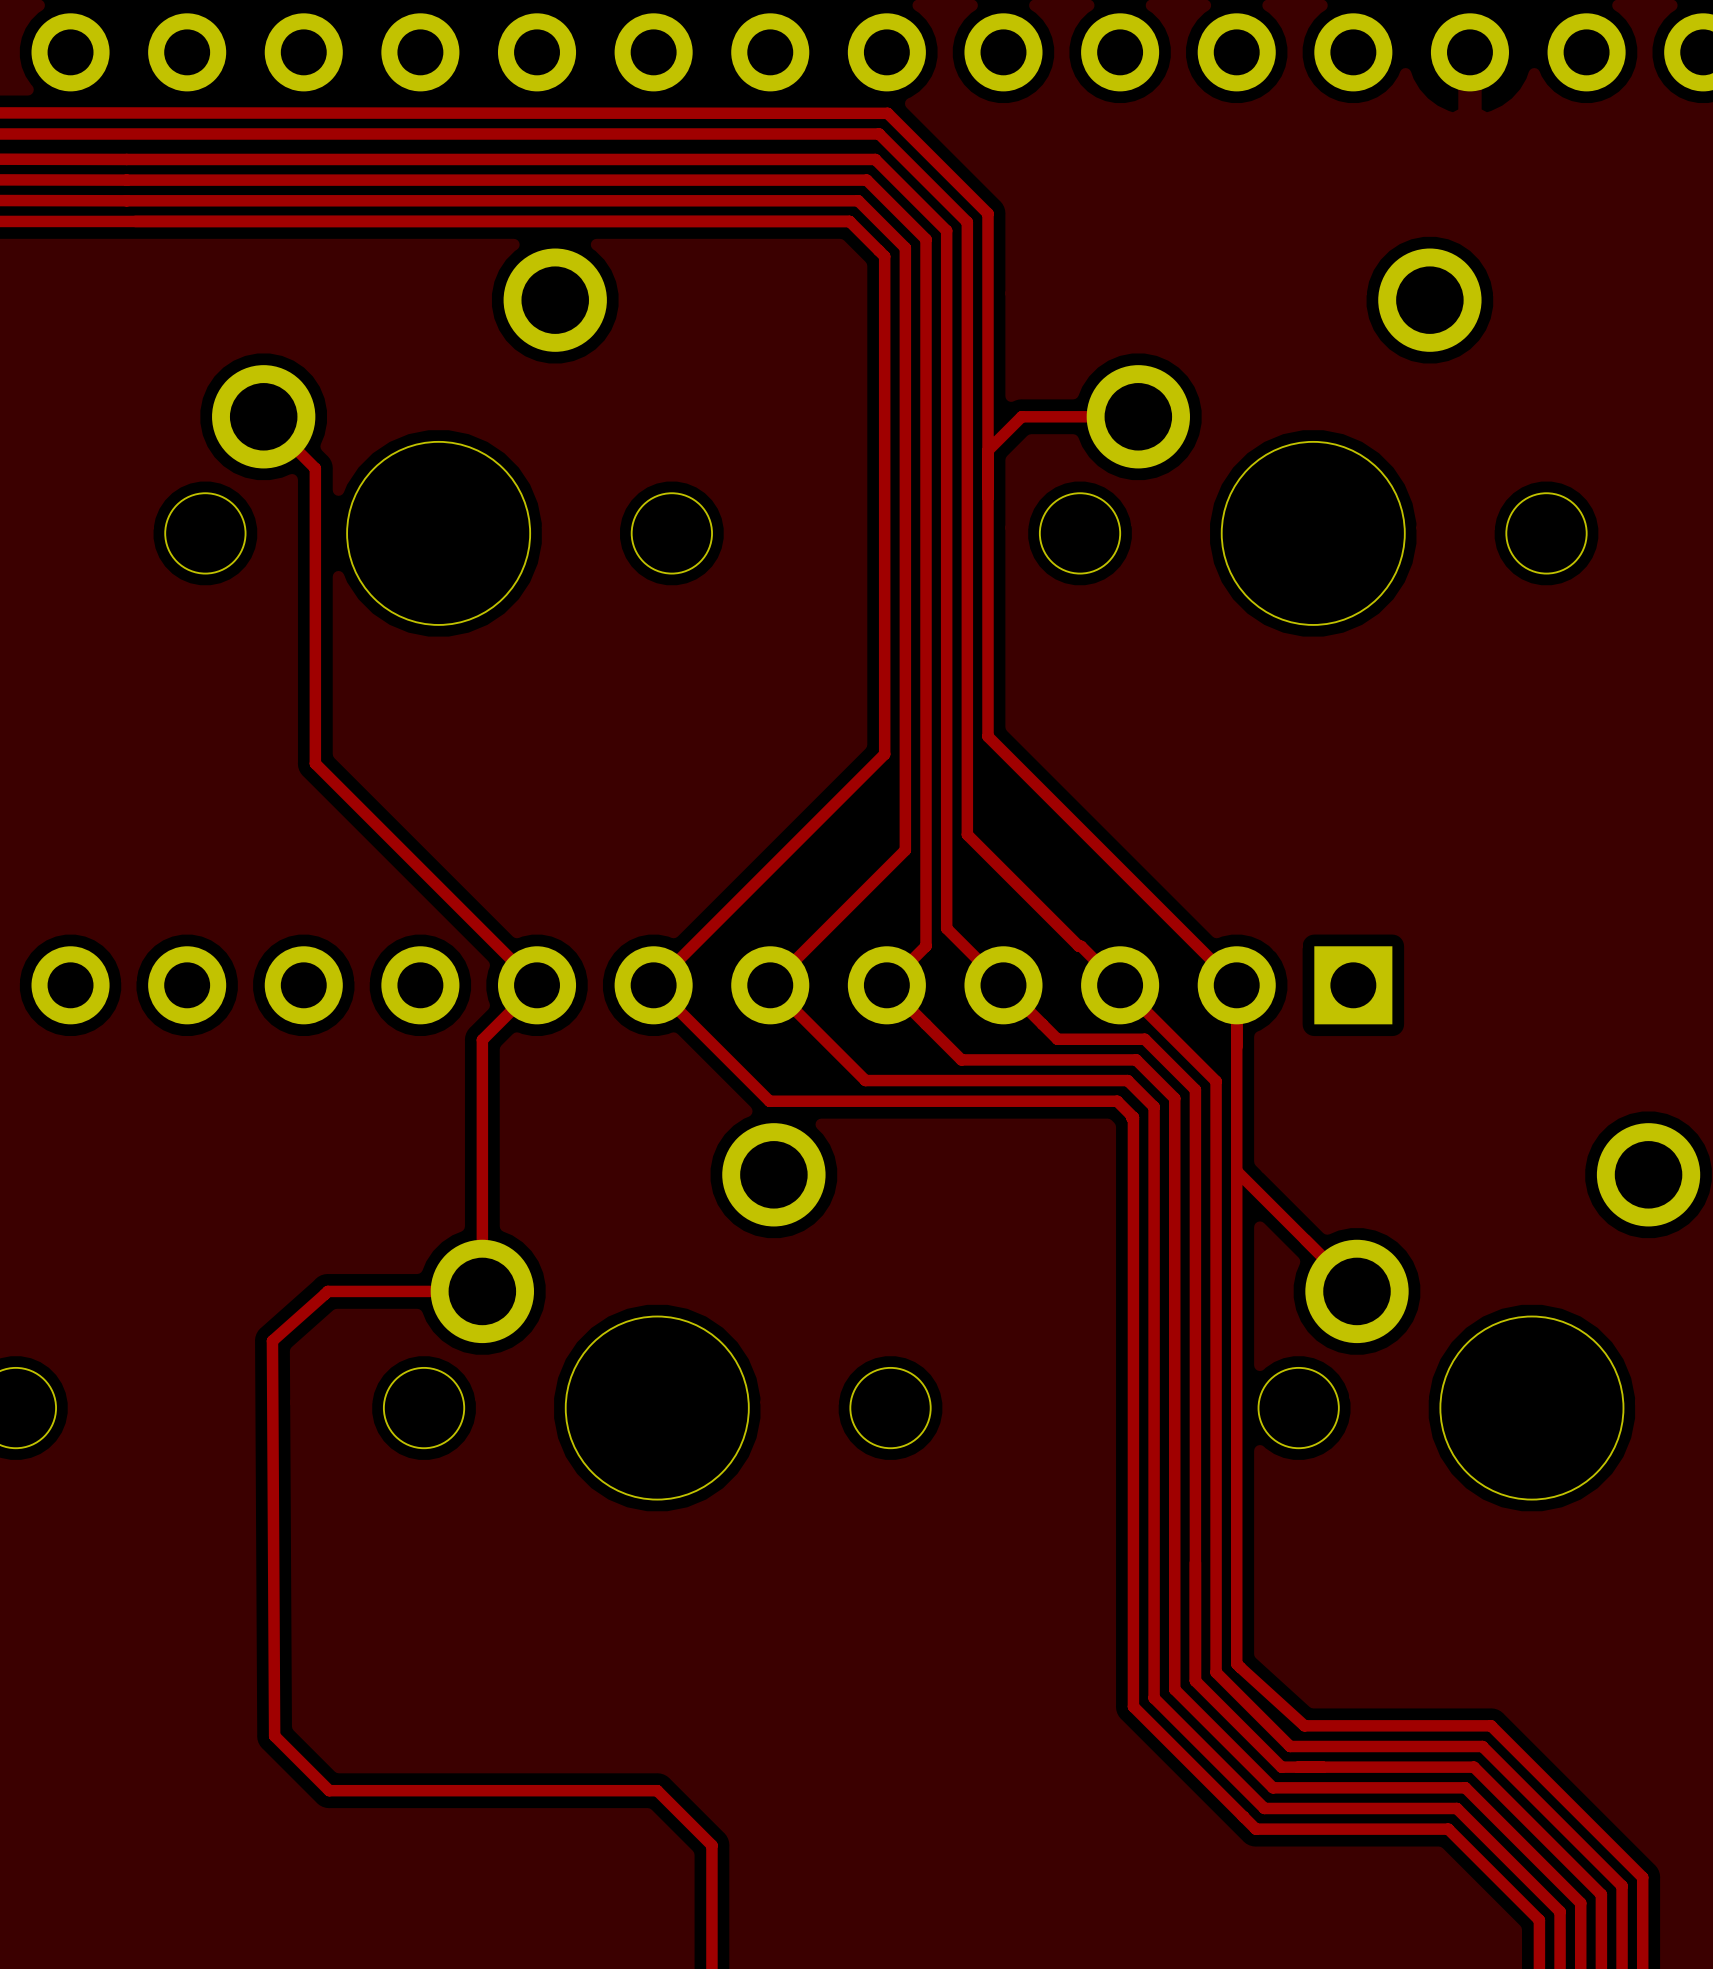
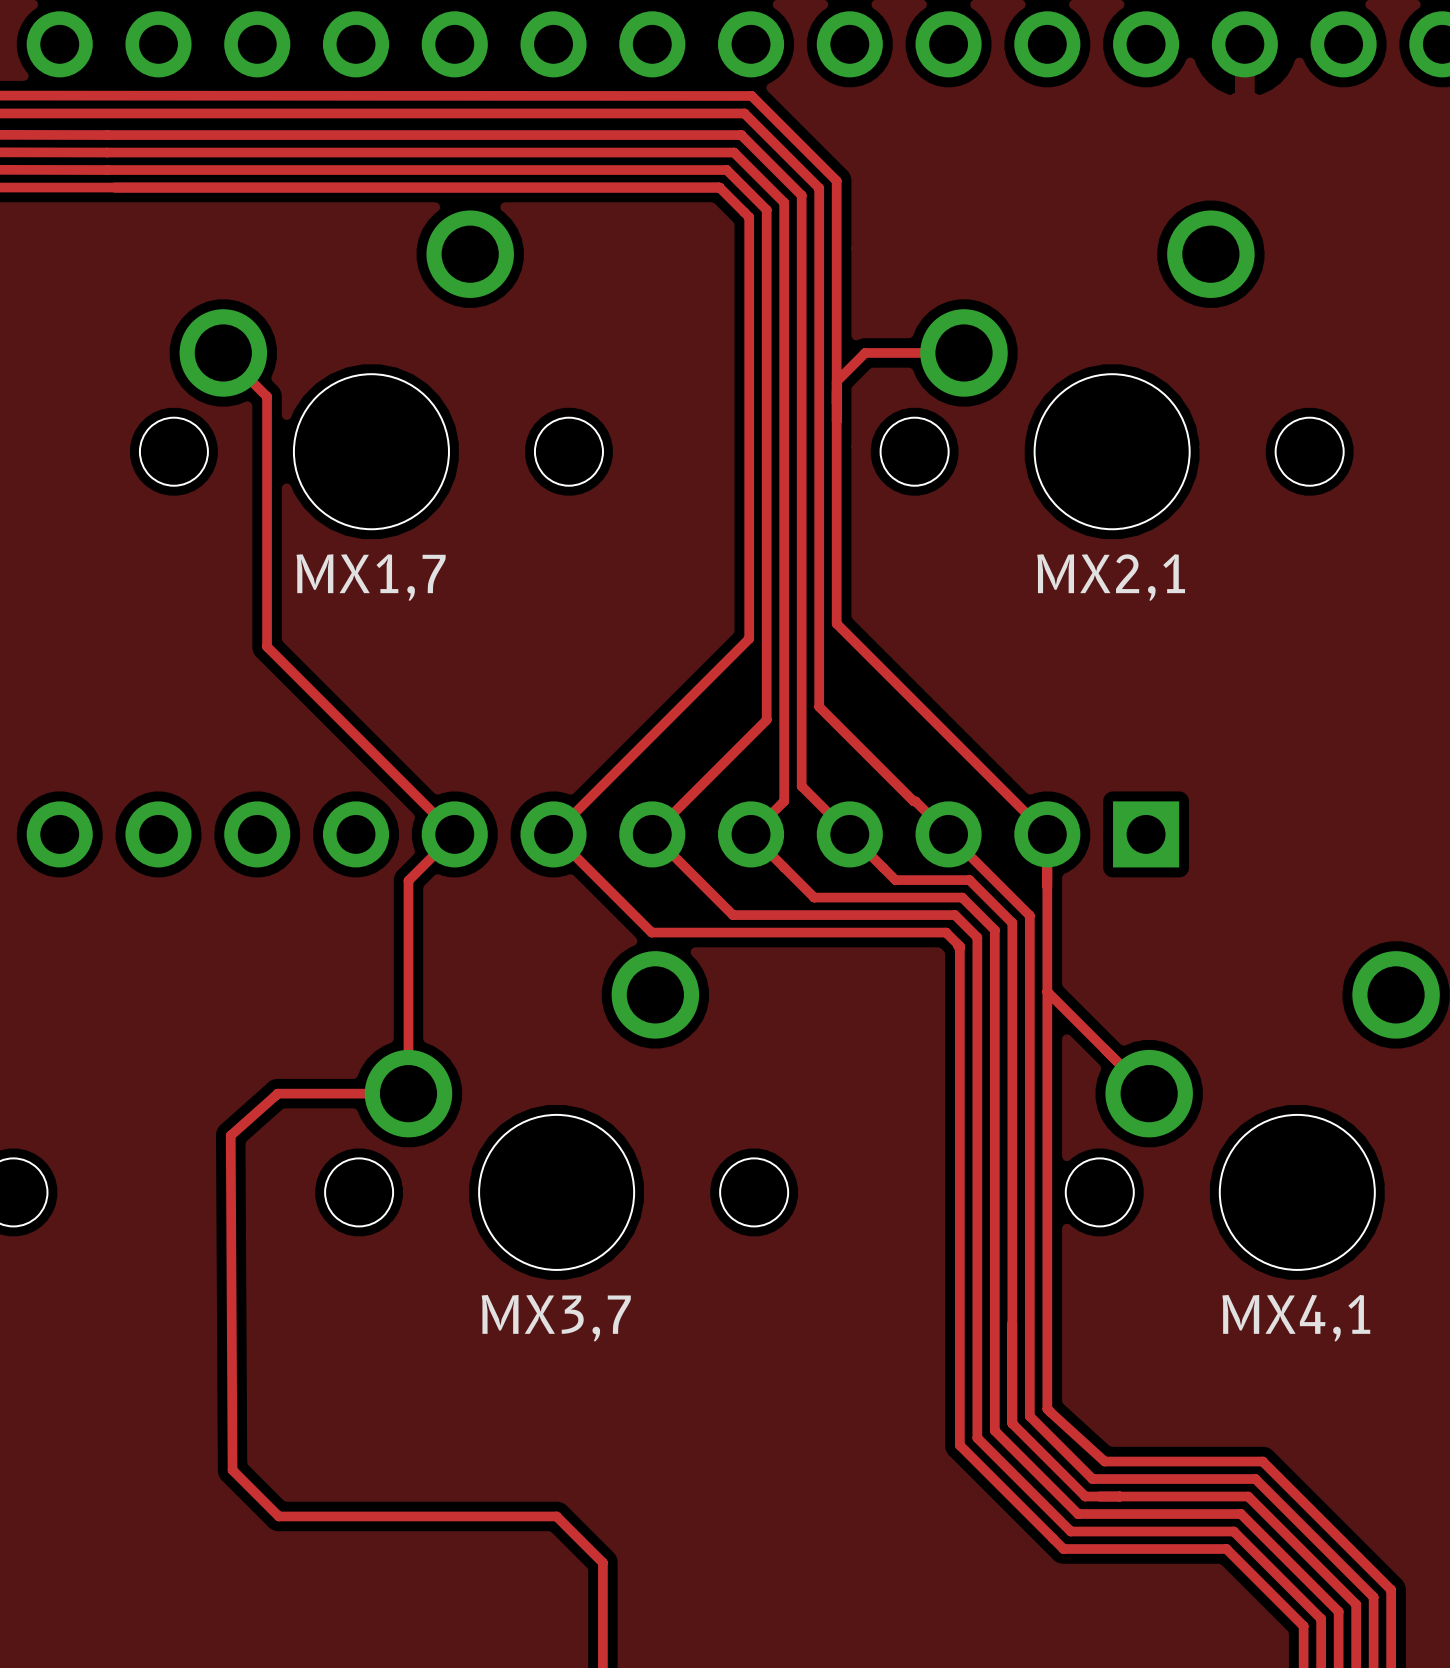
MX1,7 name: none -> MX1,7 (371, 577)
MX2,1 name: none -> MX2,1 (1111, 577)
MX3,7 name: none -> MX3,7 (556, 1318)
MX4,1 name: none -> MX4,1 (1296, 1318)

